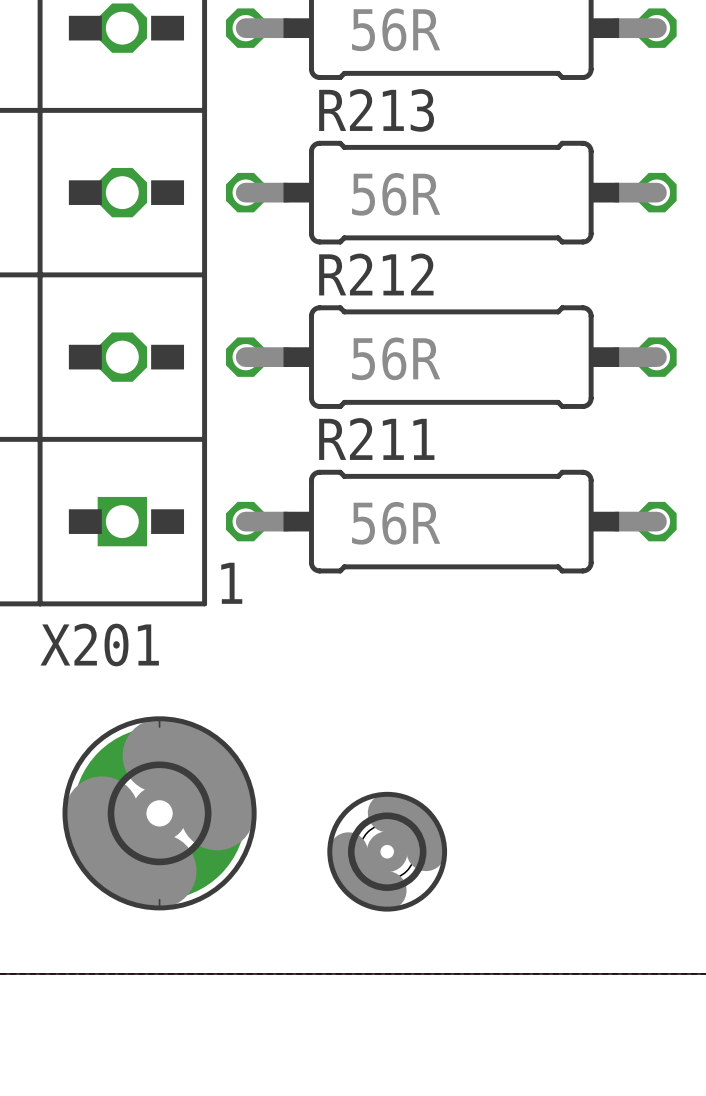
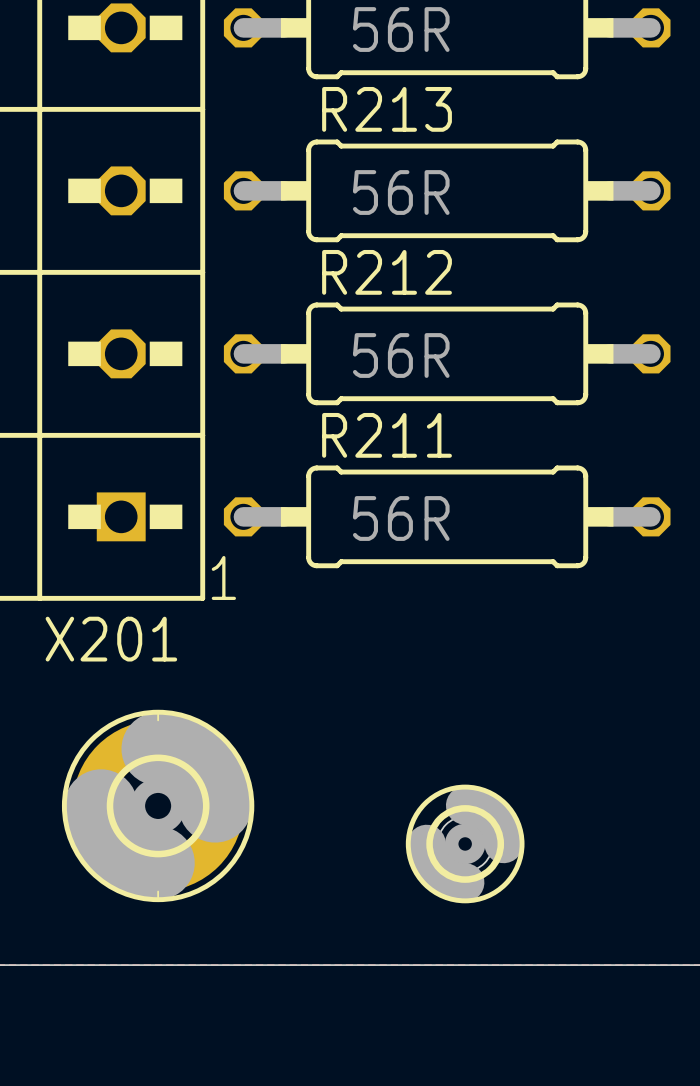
part position: (387, 851) -> (465, 843)

